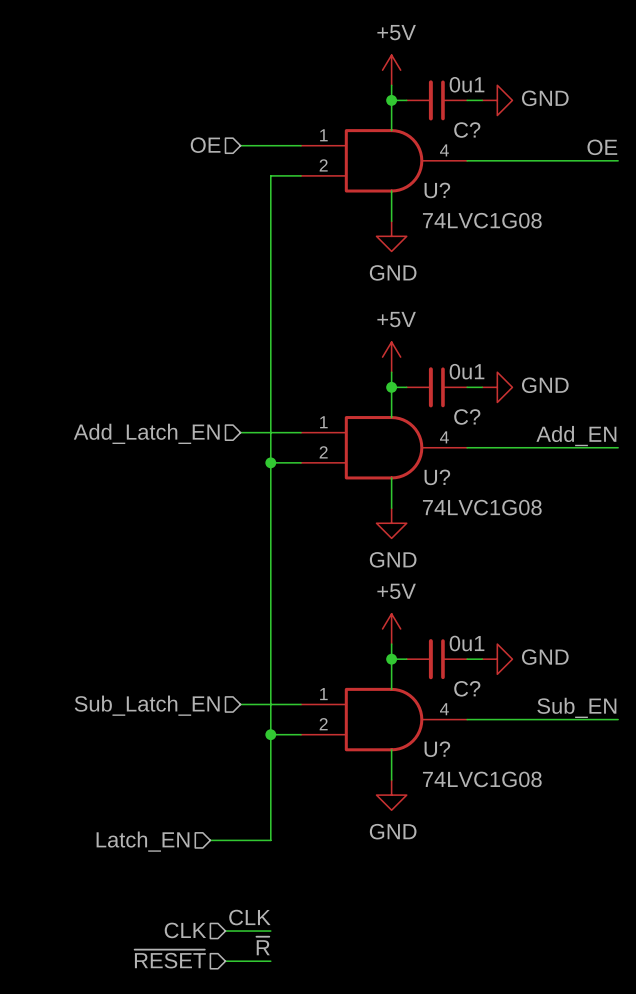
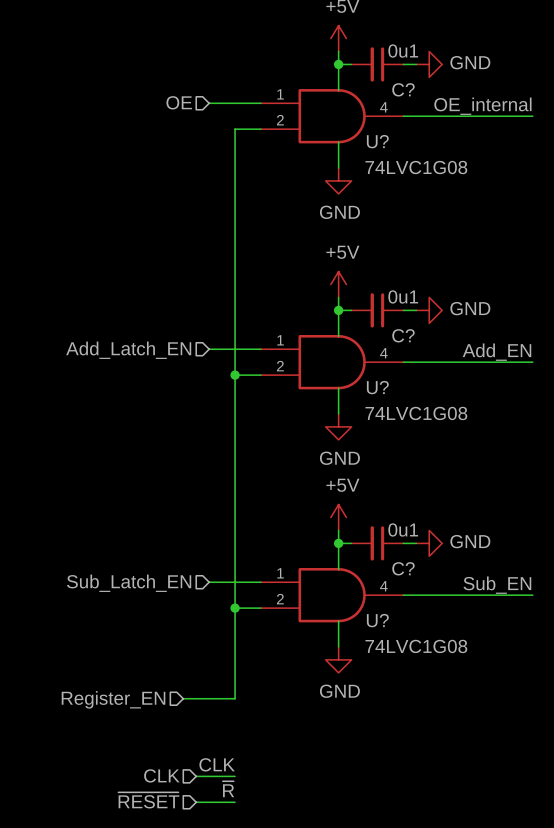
label: OE (602, 147) -> OE_internal (482, 106)
hierarchical label: Latch_EN (143, 841) -> Register_EN (113, 699)

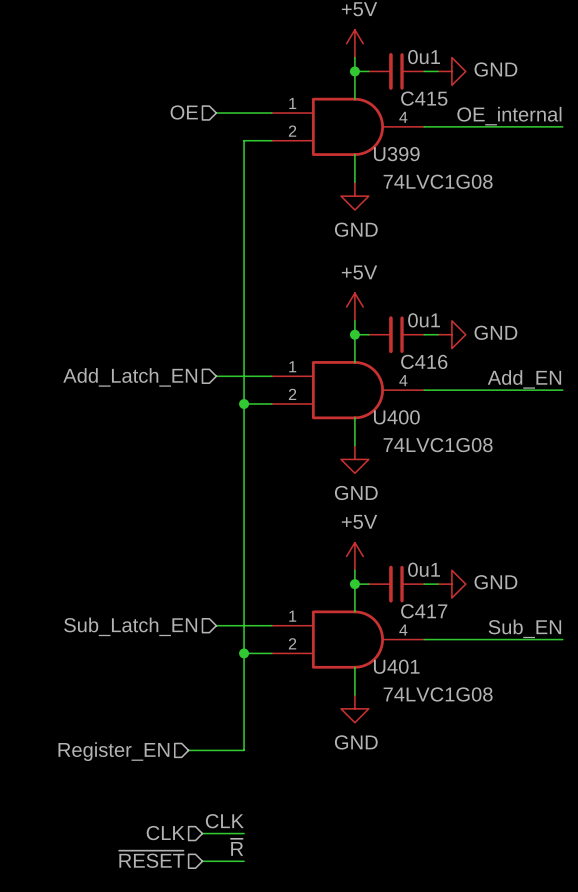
C? name: C? (403, 89) -> C415 (424, 98)
U? name: U? (377, 141) -> U399 (396, 154)
C? name: C? (403, 335) -> C416 (424, 361)
U? name: U? (377, 387) -> U400 (396, 417)
C? name: C? (403, 568) -> C417 (424, 611)
U? name: U? (377, 620) -> U401 (396, 666)

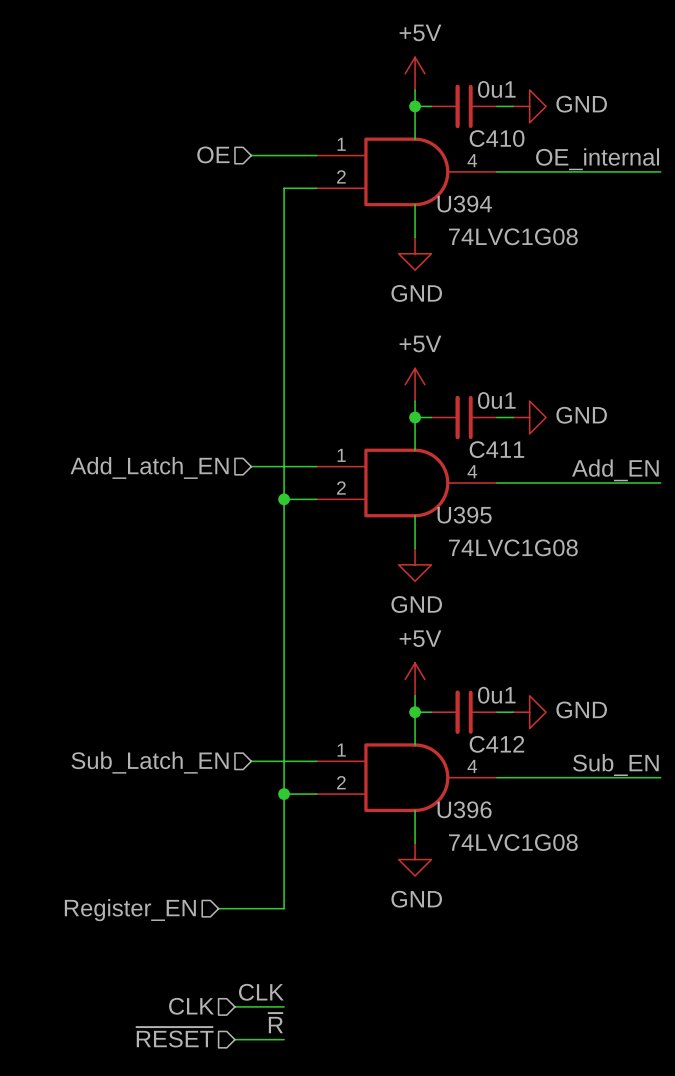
C415 name: C415 (424, 98) -> C410 (497, 138)
U399 name: U399 (396, 154) -> U394 (464, 204)
C416 name: C416 (424, 361) -> C411 (496, 449)
U400 name: U400 (396, 417) -> U395 (464, 515)
C417 name: C417 (424, 611) -> C412 (496, 744)
U401 name: U401 (396, 666) -> U396 (464, 809)

